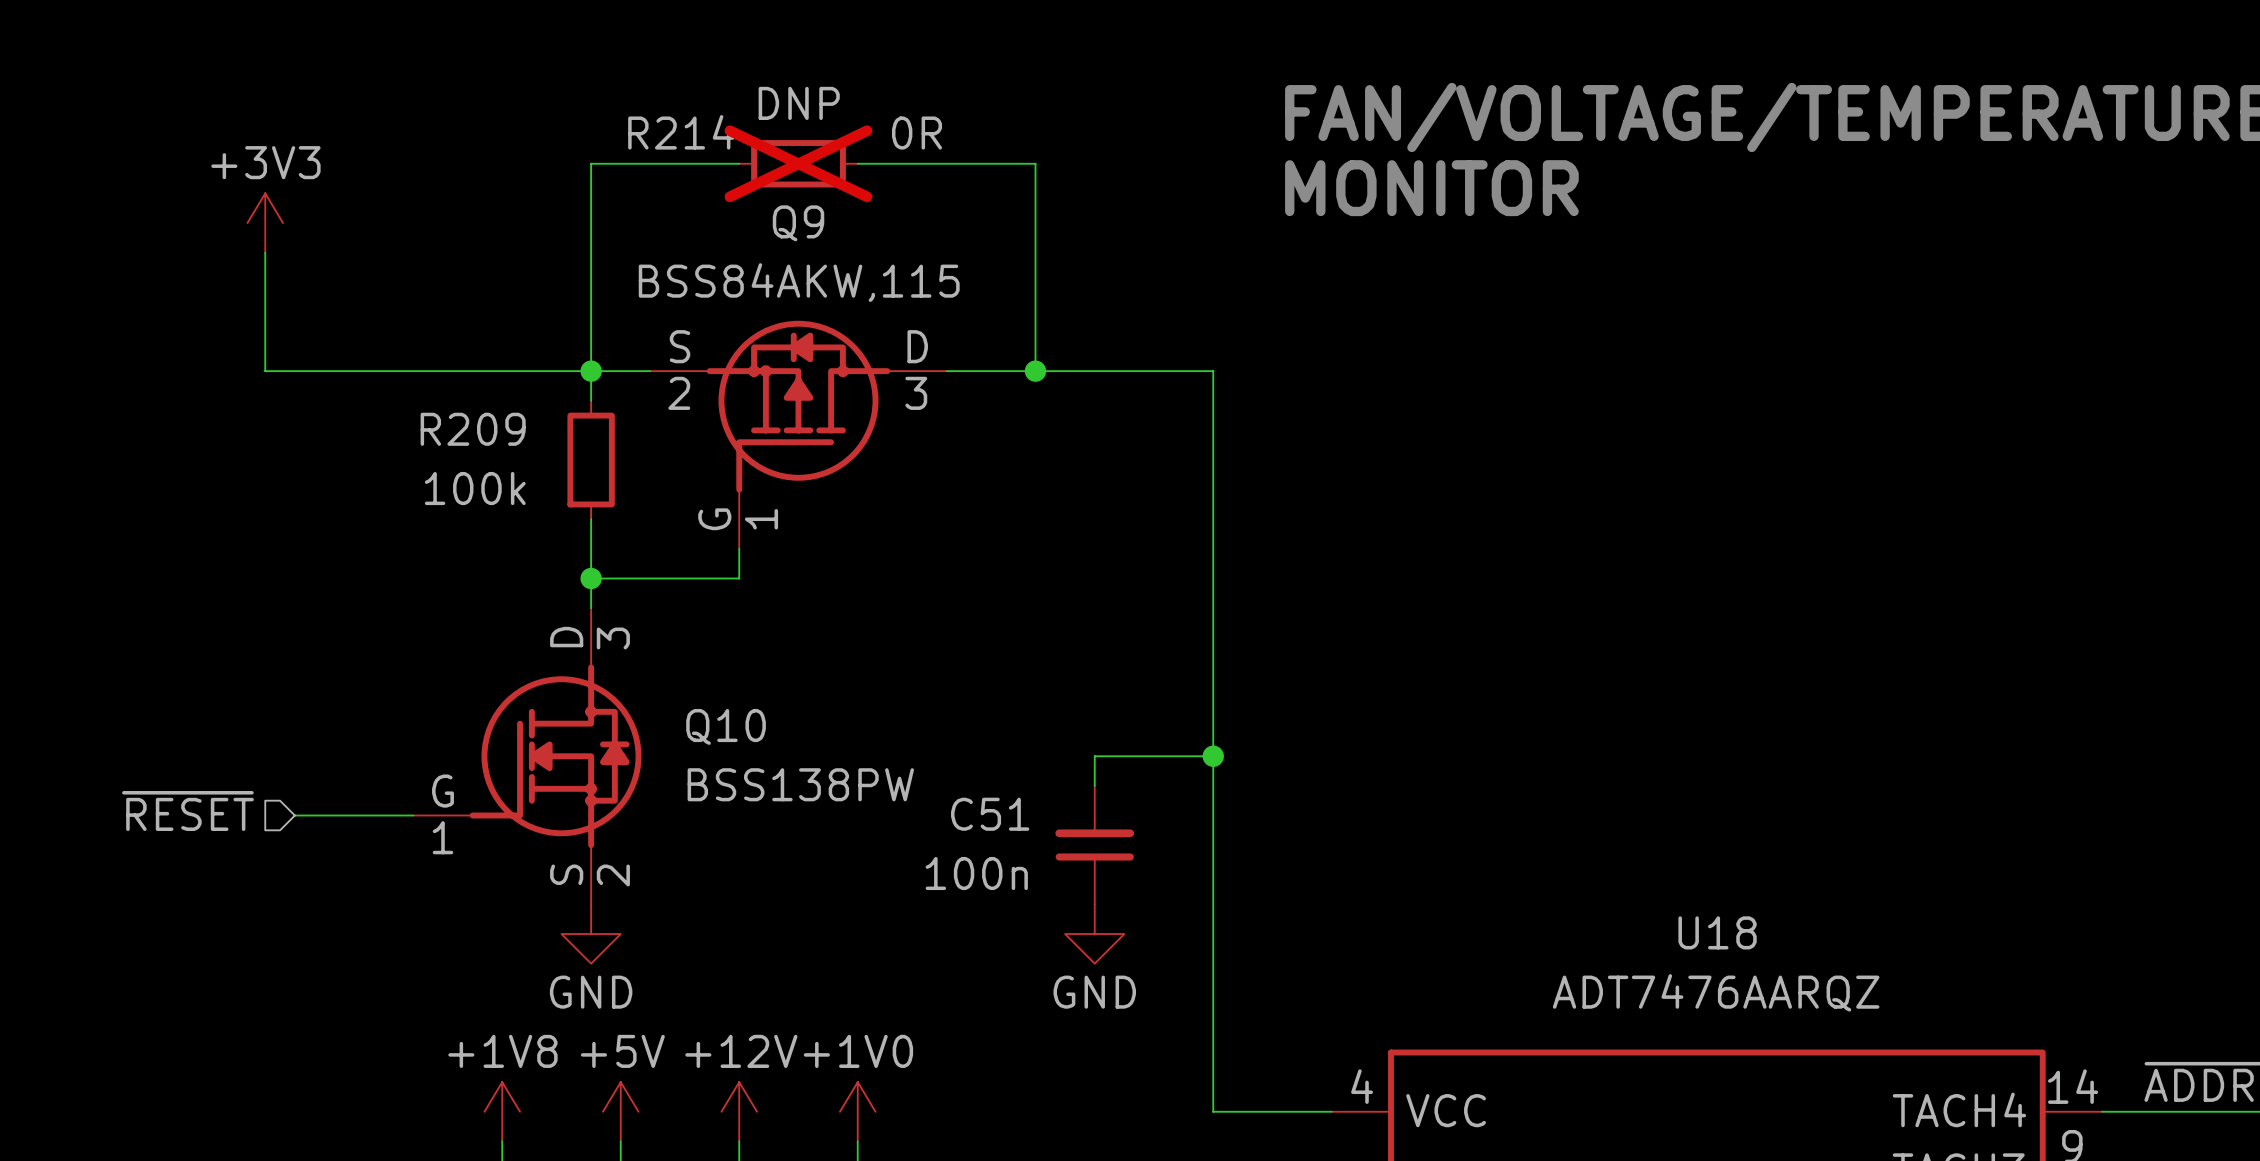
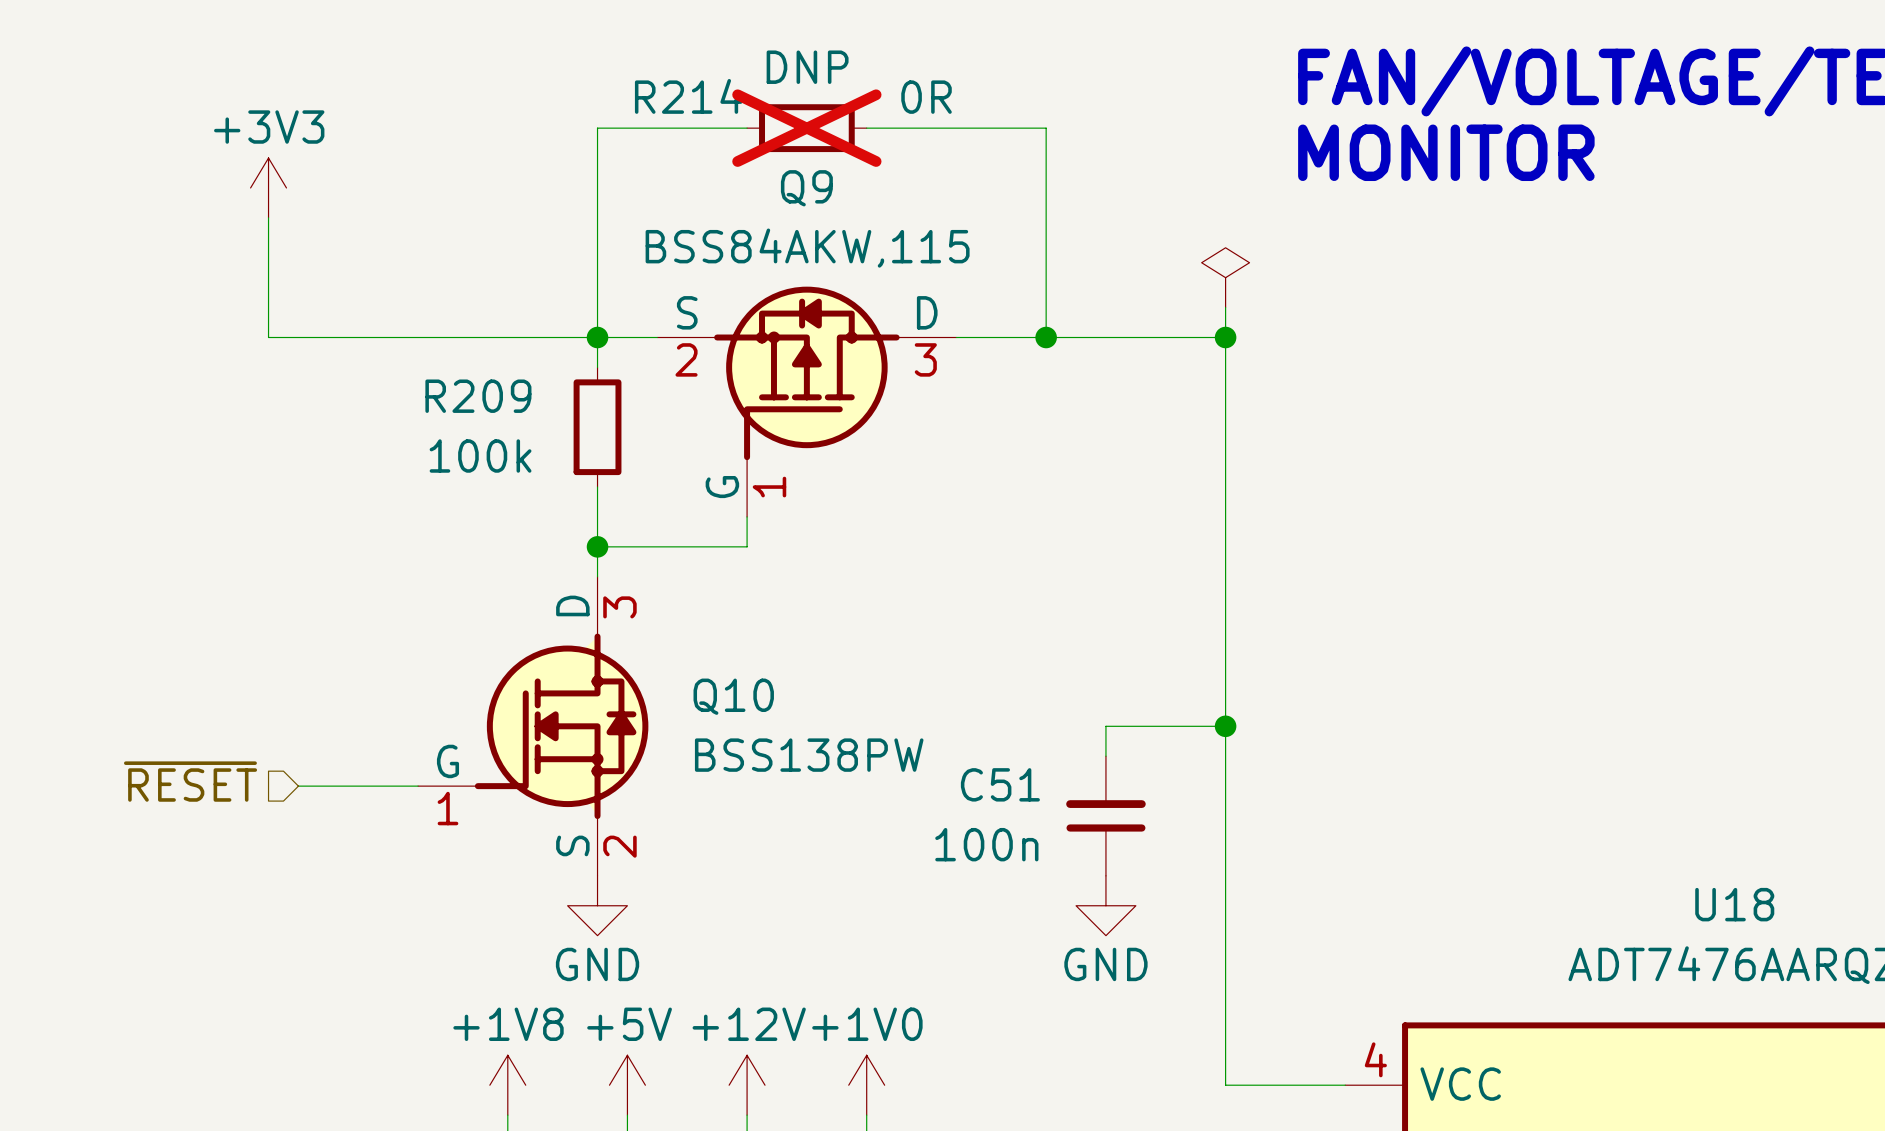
power symbol: none -> (1225, 277)
wire: none -> (1225, 307) (1225, 337)
junction: none -> (1225, 337)

